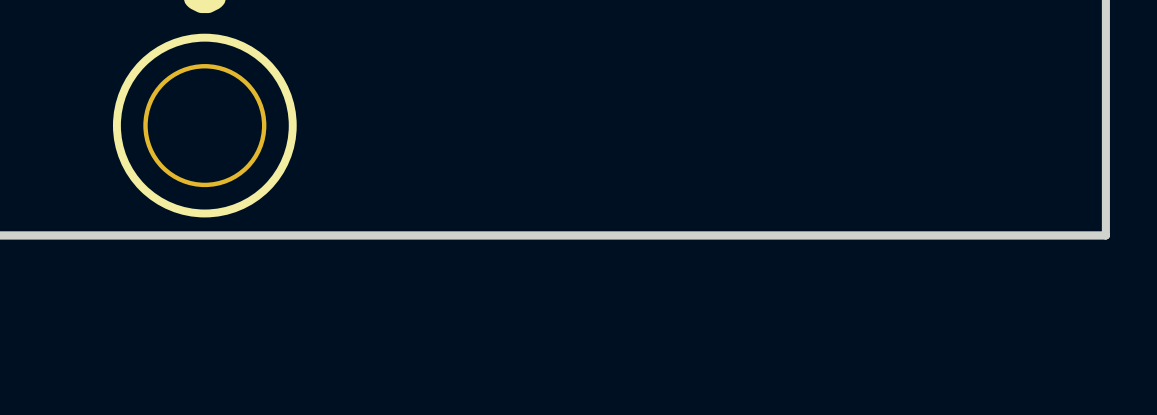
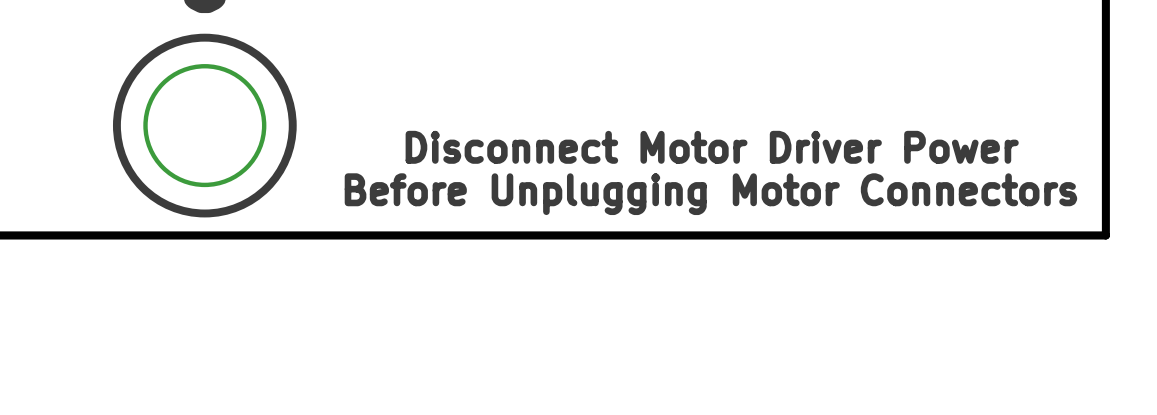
text: none -> Disconnect Motor Driver Power (712, 147)
text: none -> Before Unplugging Motor Connectors (710, 194)

